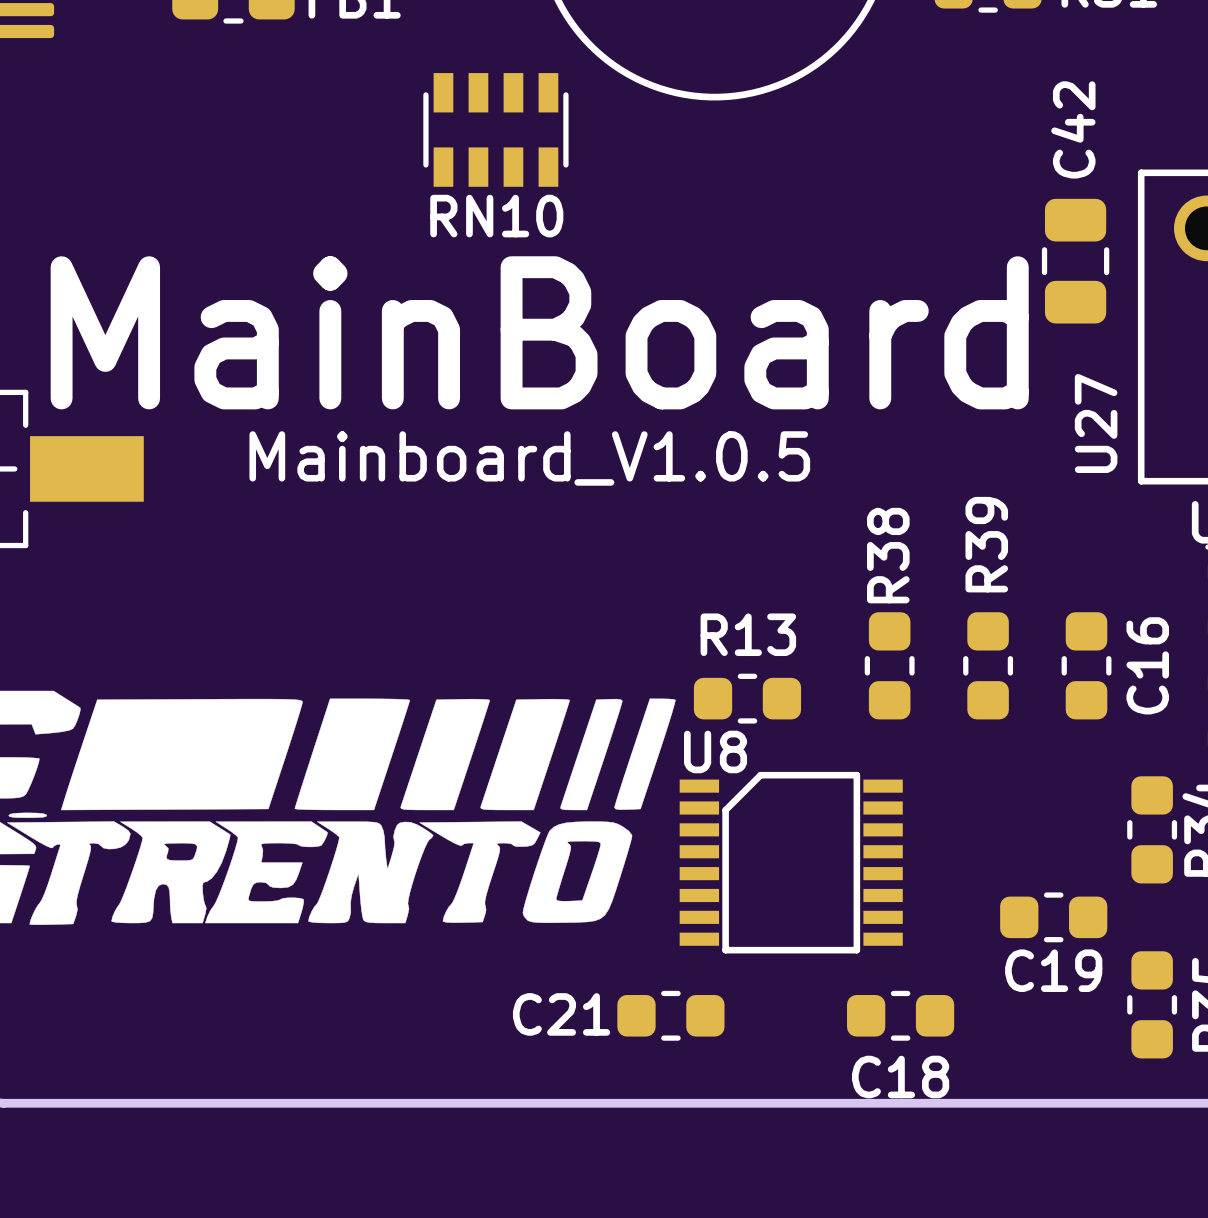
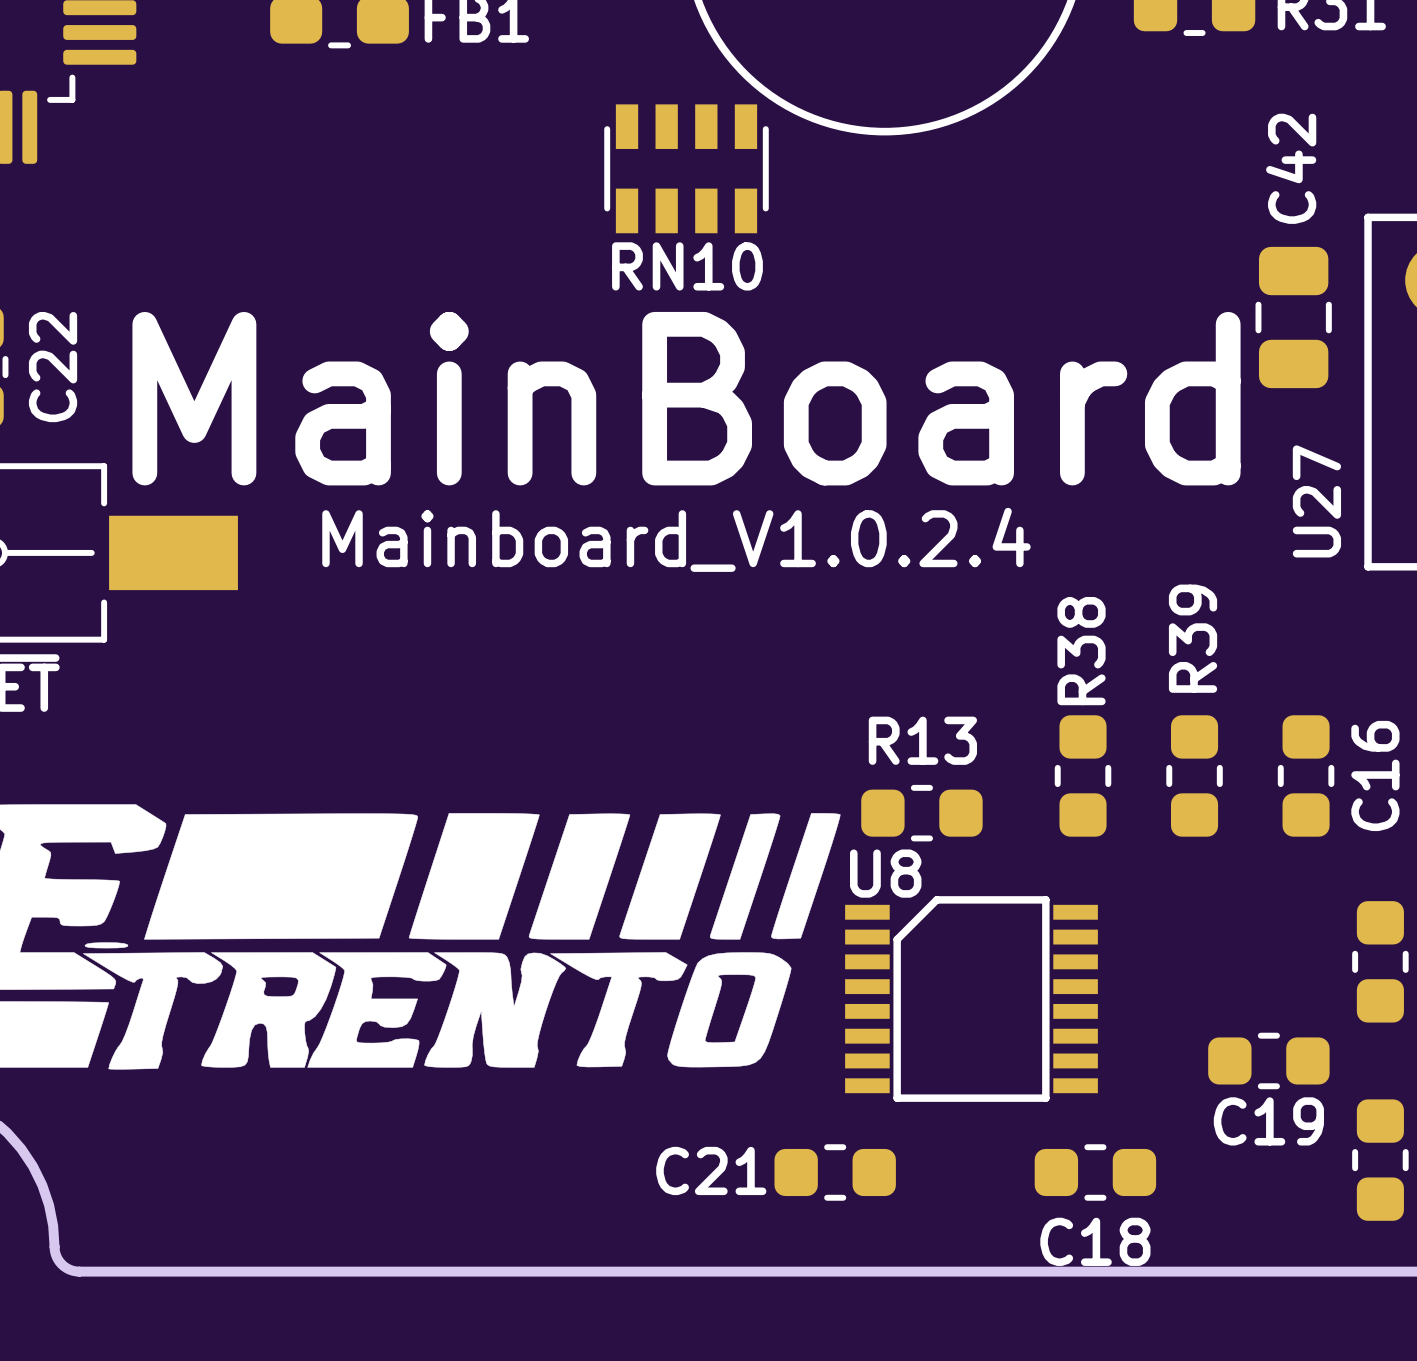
RN10 position: (495, 129) -> (686, 168)
text: Mainboard_V1.0.5 (529, 458) -> Mainboard_V1.0.2.4 (676, 539)

